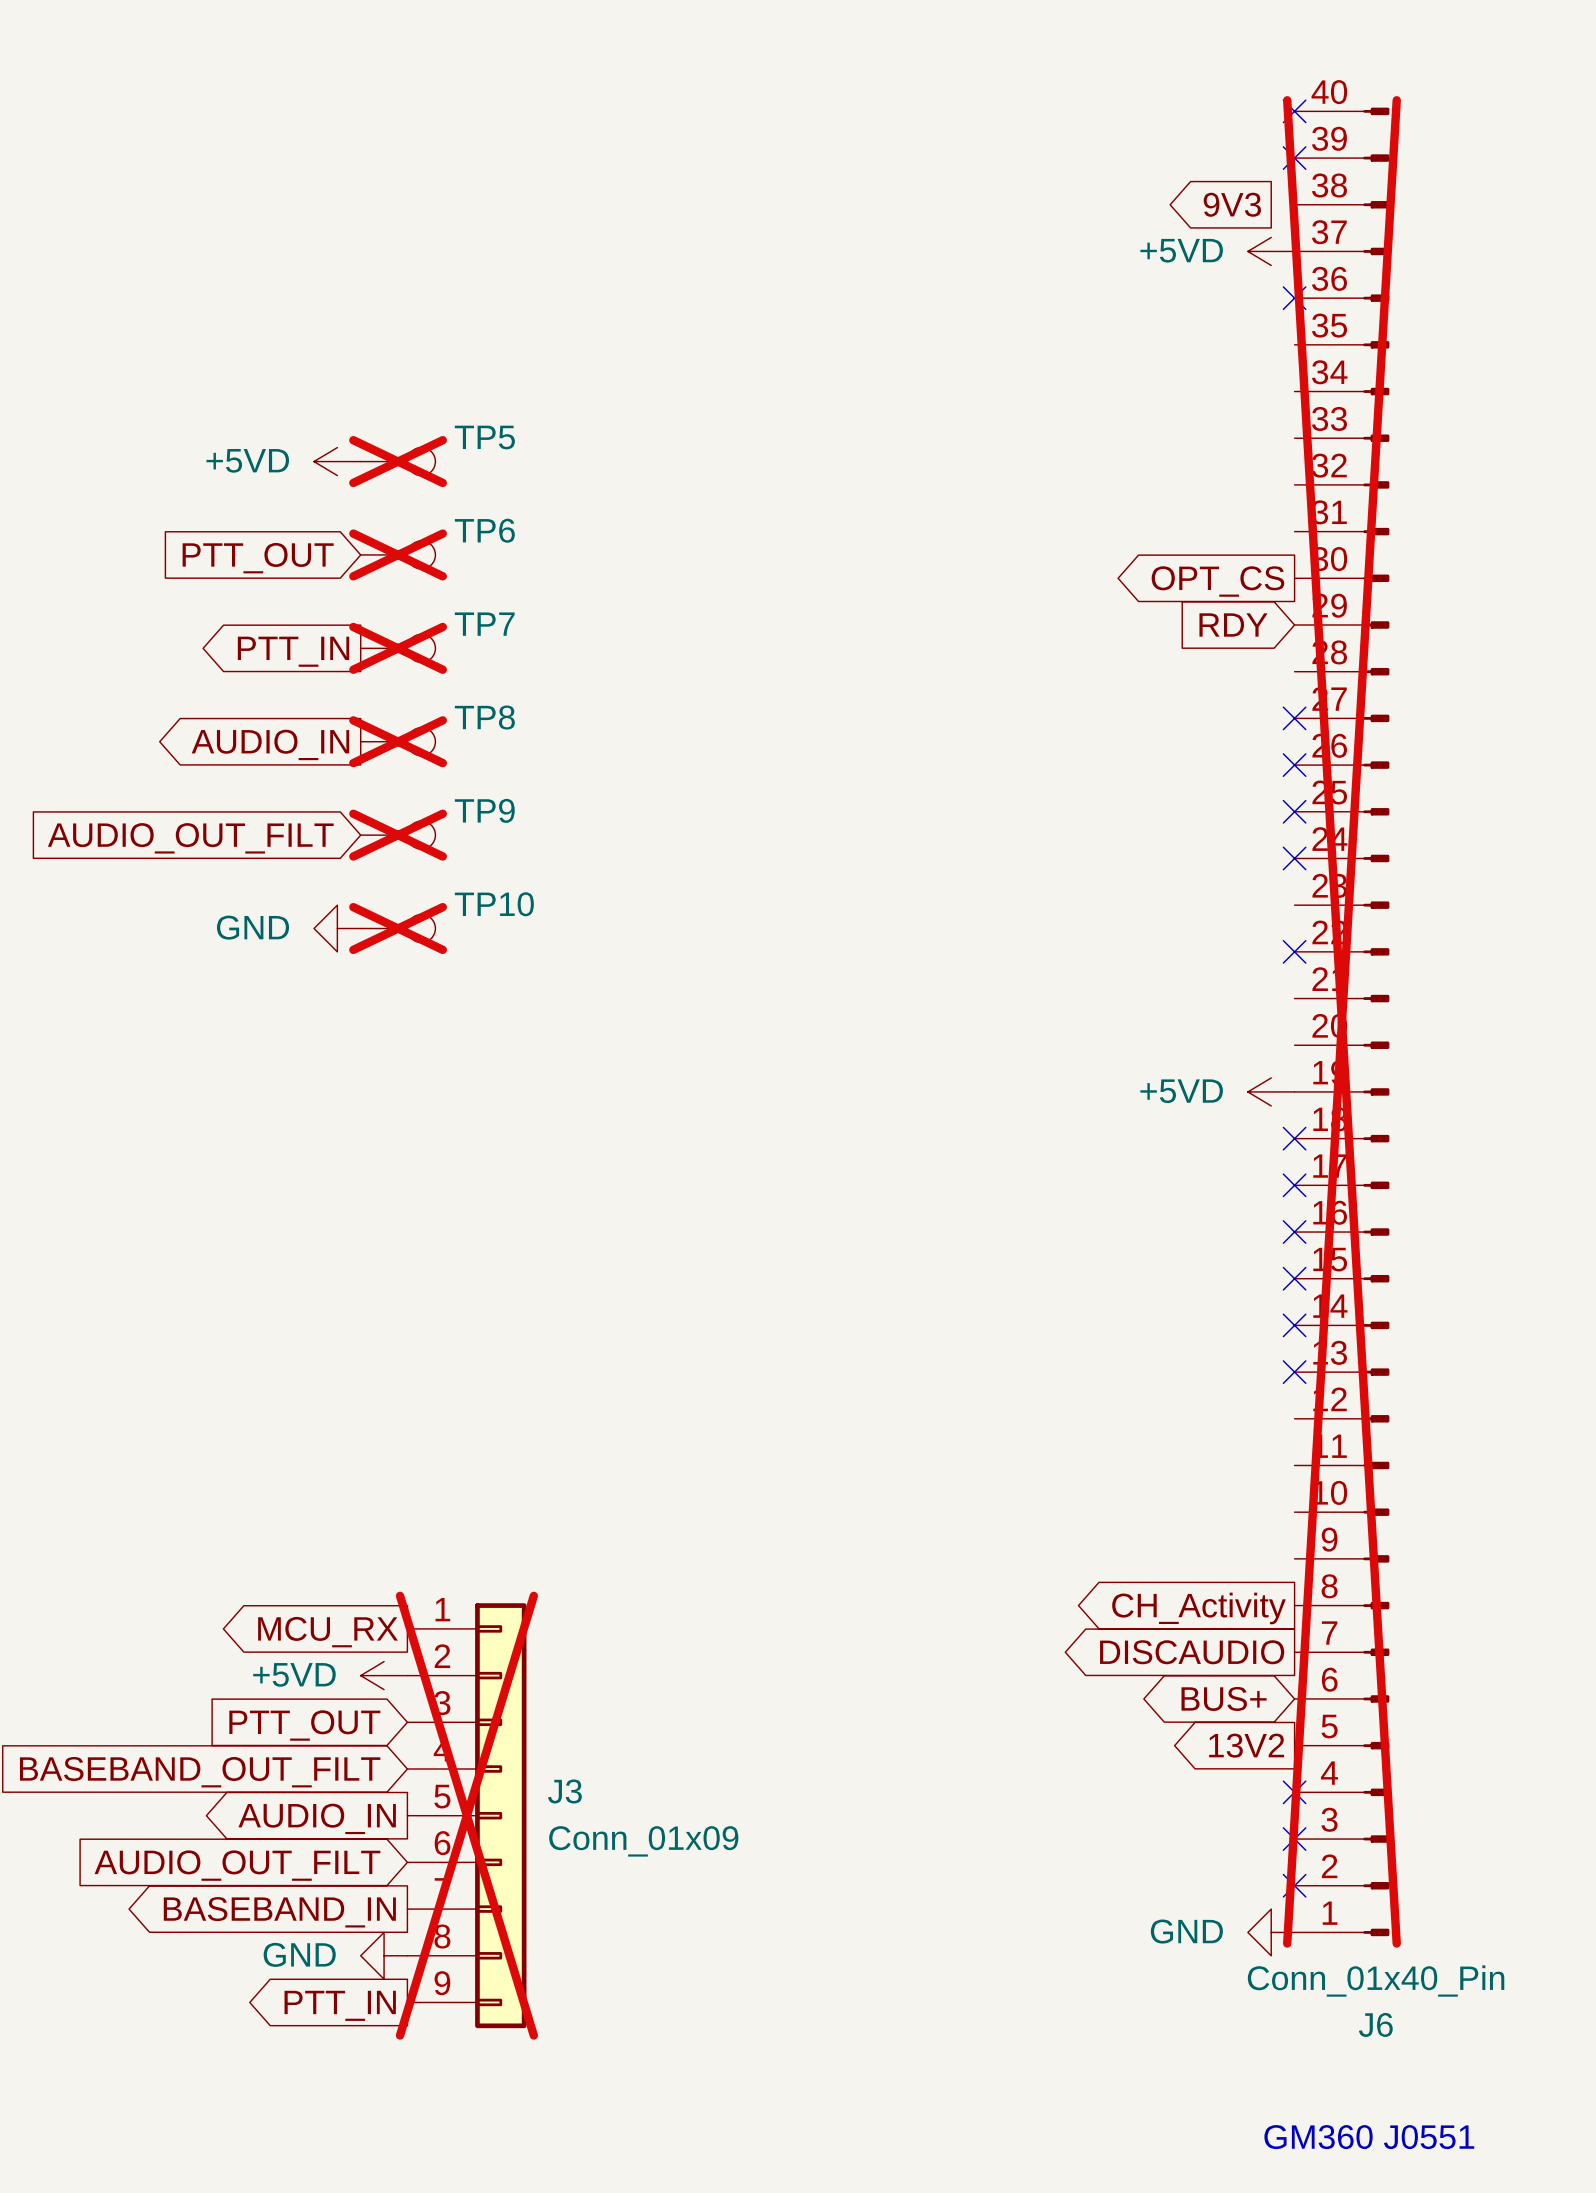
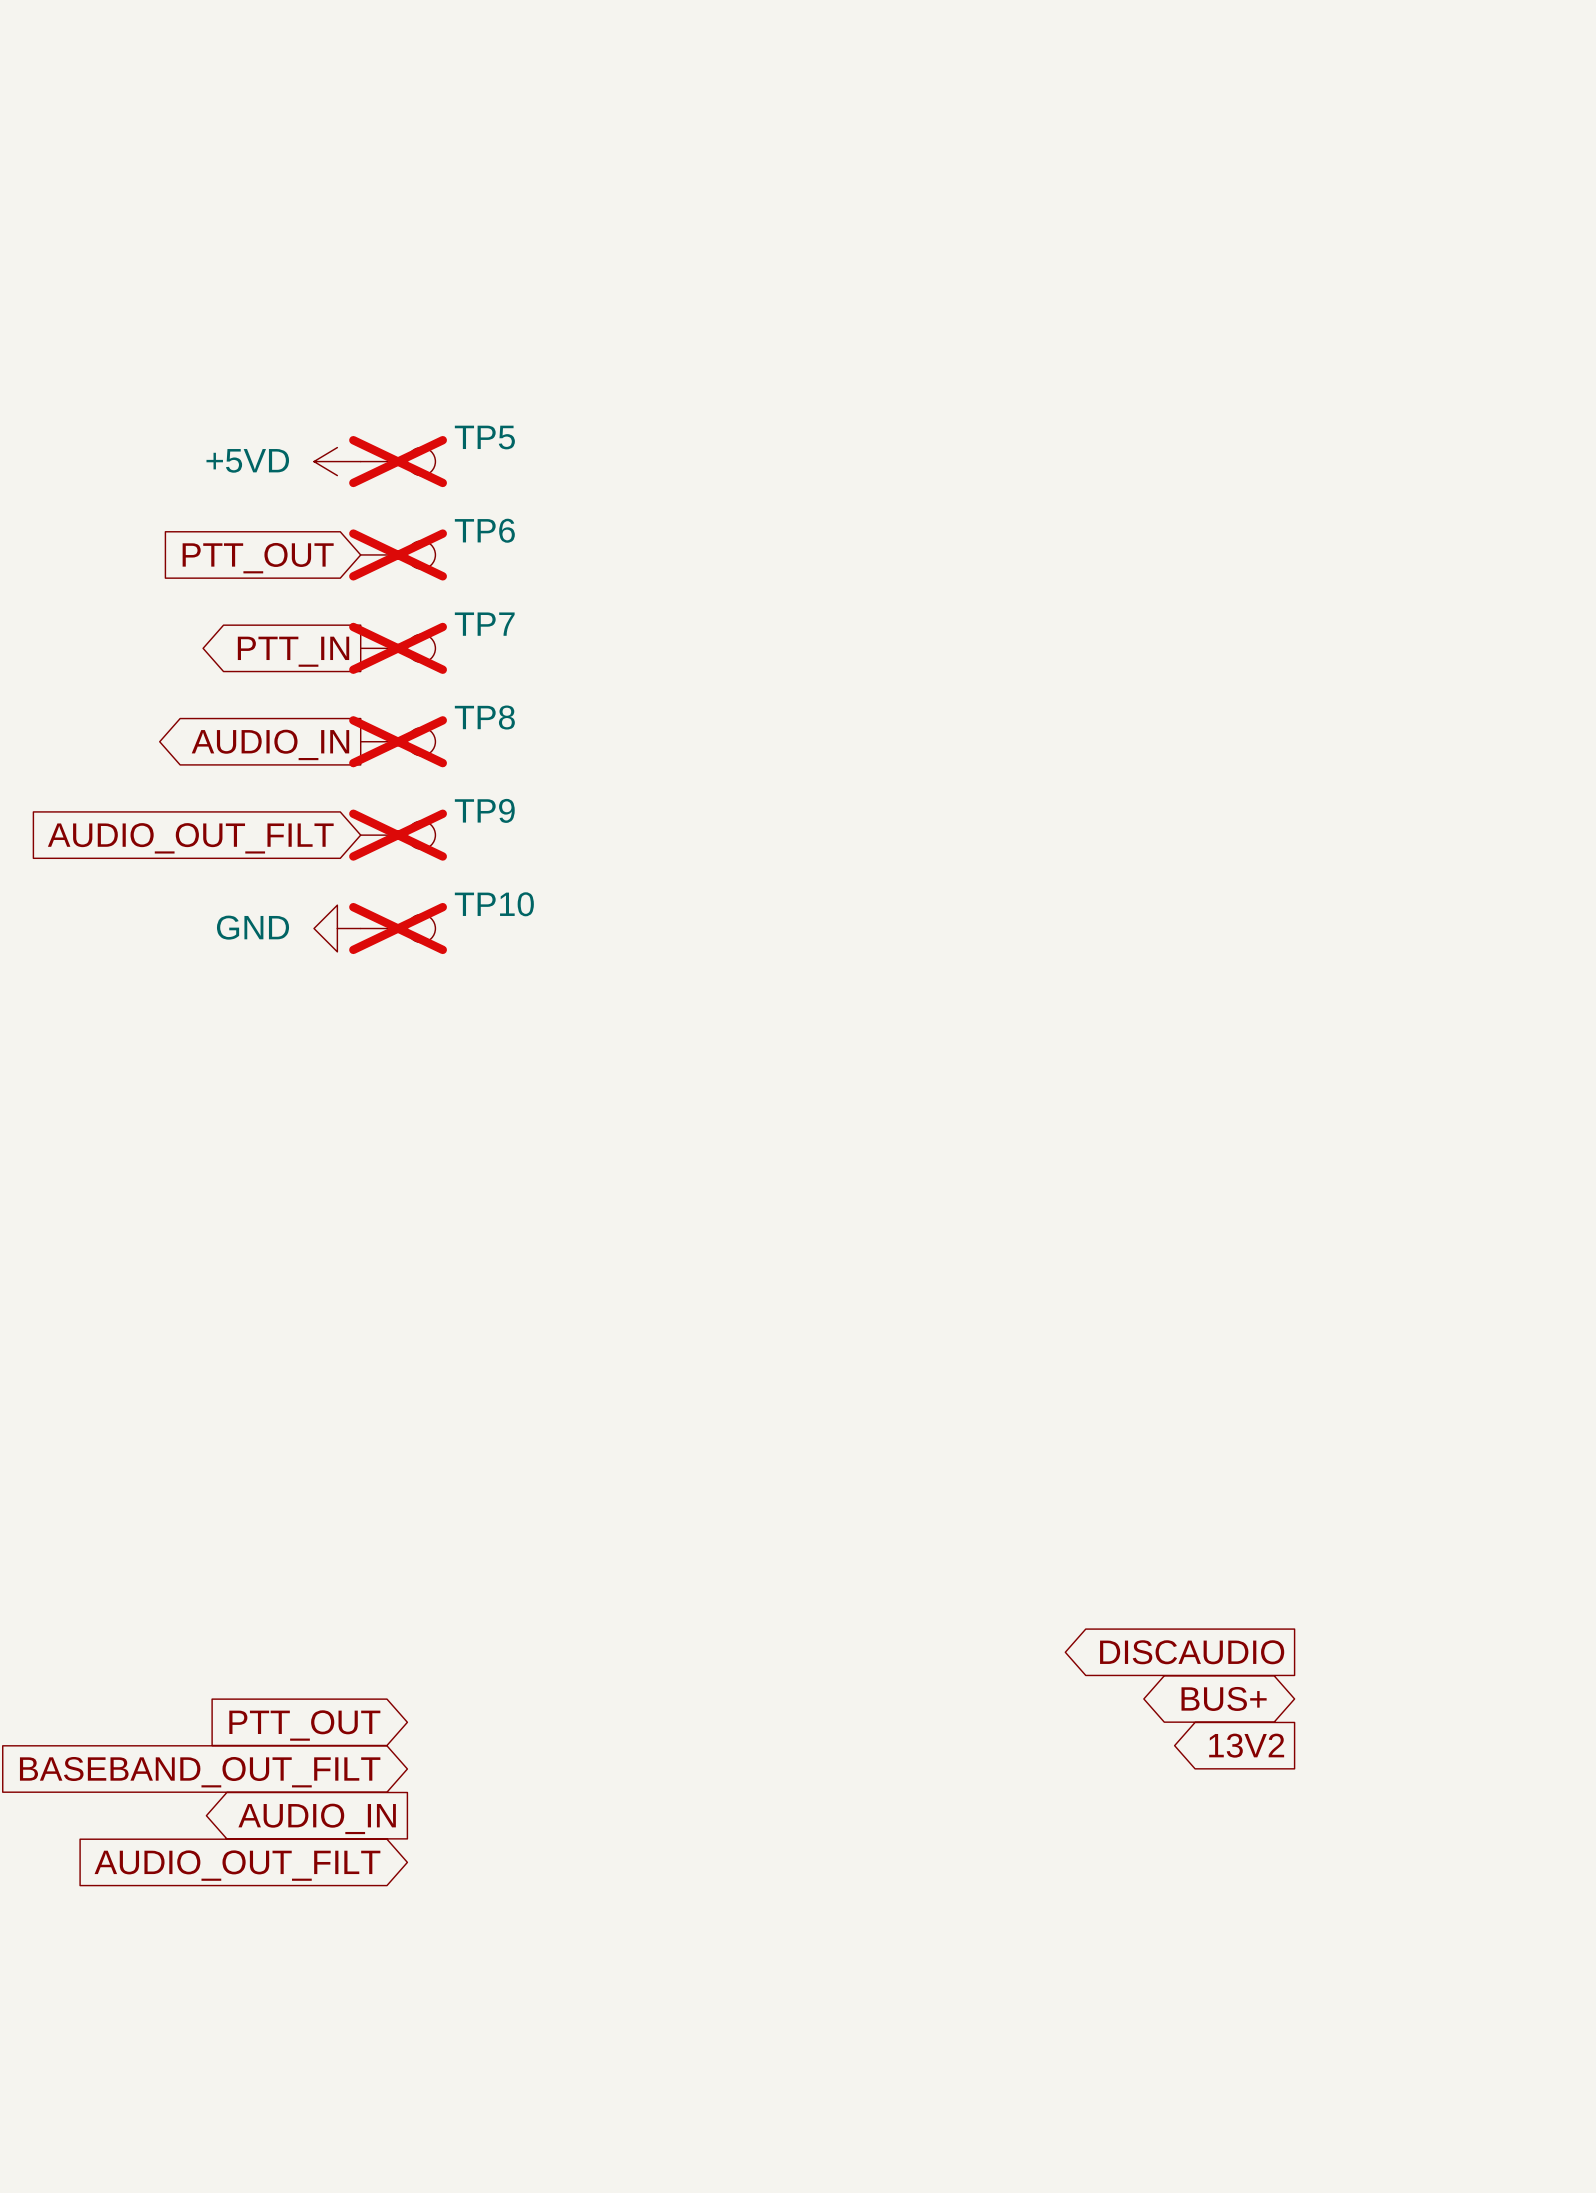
no-connect mark: (1294, 111) -> none
no-connect mark: (1294, 158) -> none
global label: 9V3 (1232, 204) -> none
power symbol: +5VD (1271, 251) -> none
no-connect mark: (1294, 298) -> none
global label: OPT_CS (1217, 581) -> none
global label: RDY (1233, 625) -> none
no-connect mark: (1294, 718) -> none
no-connect mark: (1294, 765) -> none
no-connect mark: (1294, 811) -> none
no-connect mark: (1294, 858) -> none
no-connect mark: (1294, 951) -> none
J6: Conn_01x40_Pin (1341, 1021) -> none
power symbol: +5VD (1271, 1091) -> none
no-connect mark: (1294, 1138) -> none
no-connect mark: (1294, 1185) -> none
no-connect mark: (1294, 1232) -> none
no-connect mark: (1294, 1278) -> none
no-connect mark: (1294, 1325) -> none
no-connect mark: (1294, 1372) -> none
global label: CH_Activity (1198, 1608) -> none
global label: MCU_RX (328, 1632) -> none
power symbol: +5VD (384, 1675) -> none
no-connect mark: (1294, 1792) -> none
J3: Conn_01x09 (466, 1815) -> none
no-connect mark: (1294, 1839) -> none
no-connect mark: (1294, 1885) -> none
global label: BASEBAND_IN (279, 1912) -> none
power symbol: GND (1271, 1932) -> none
power symbol: GND (384, 1955) -> none
global label: PTT_IN (340, 2005) -> none
text: GM360 J0551 (1369, 2137) -> none

